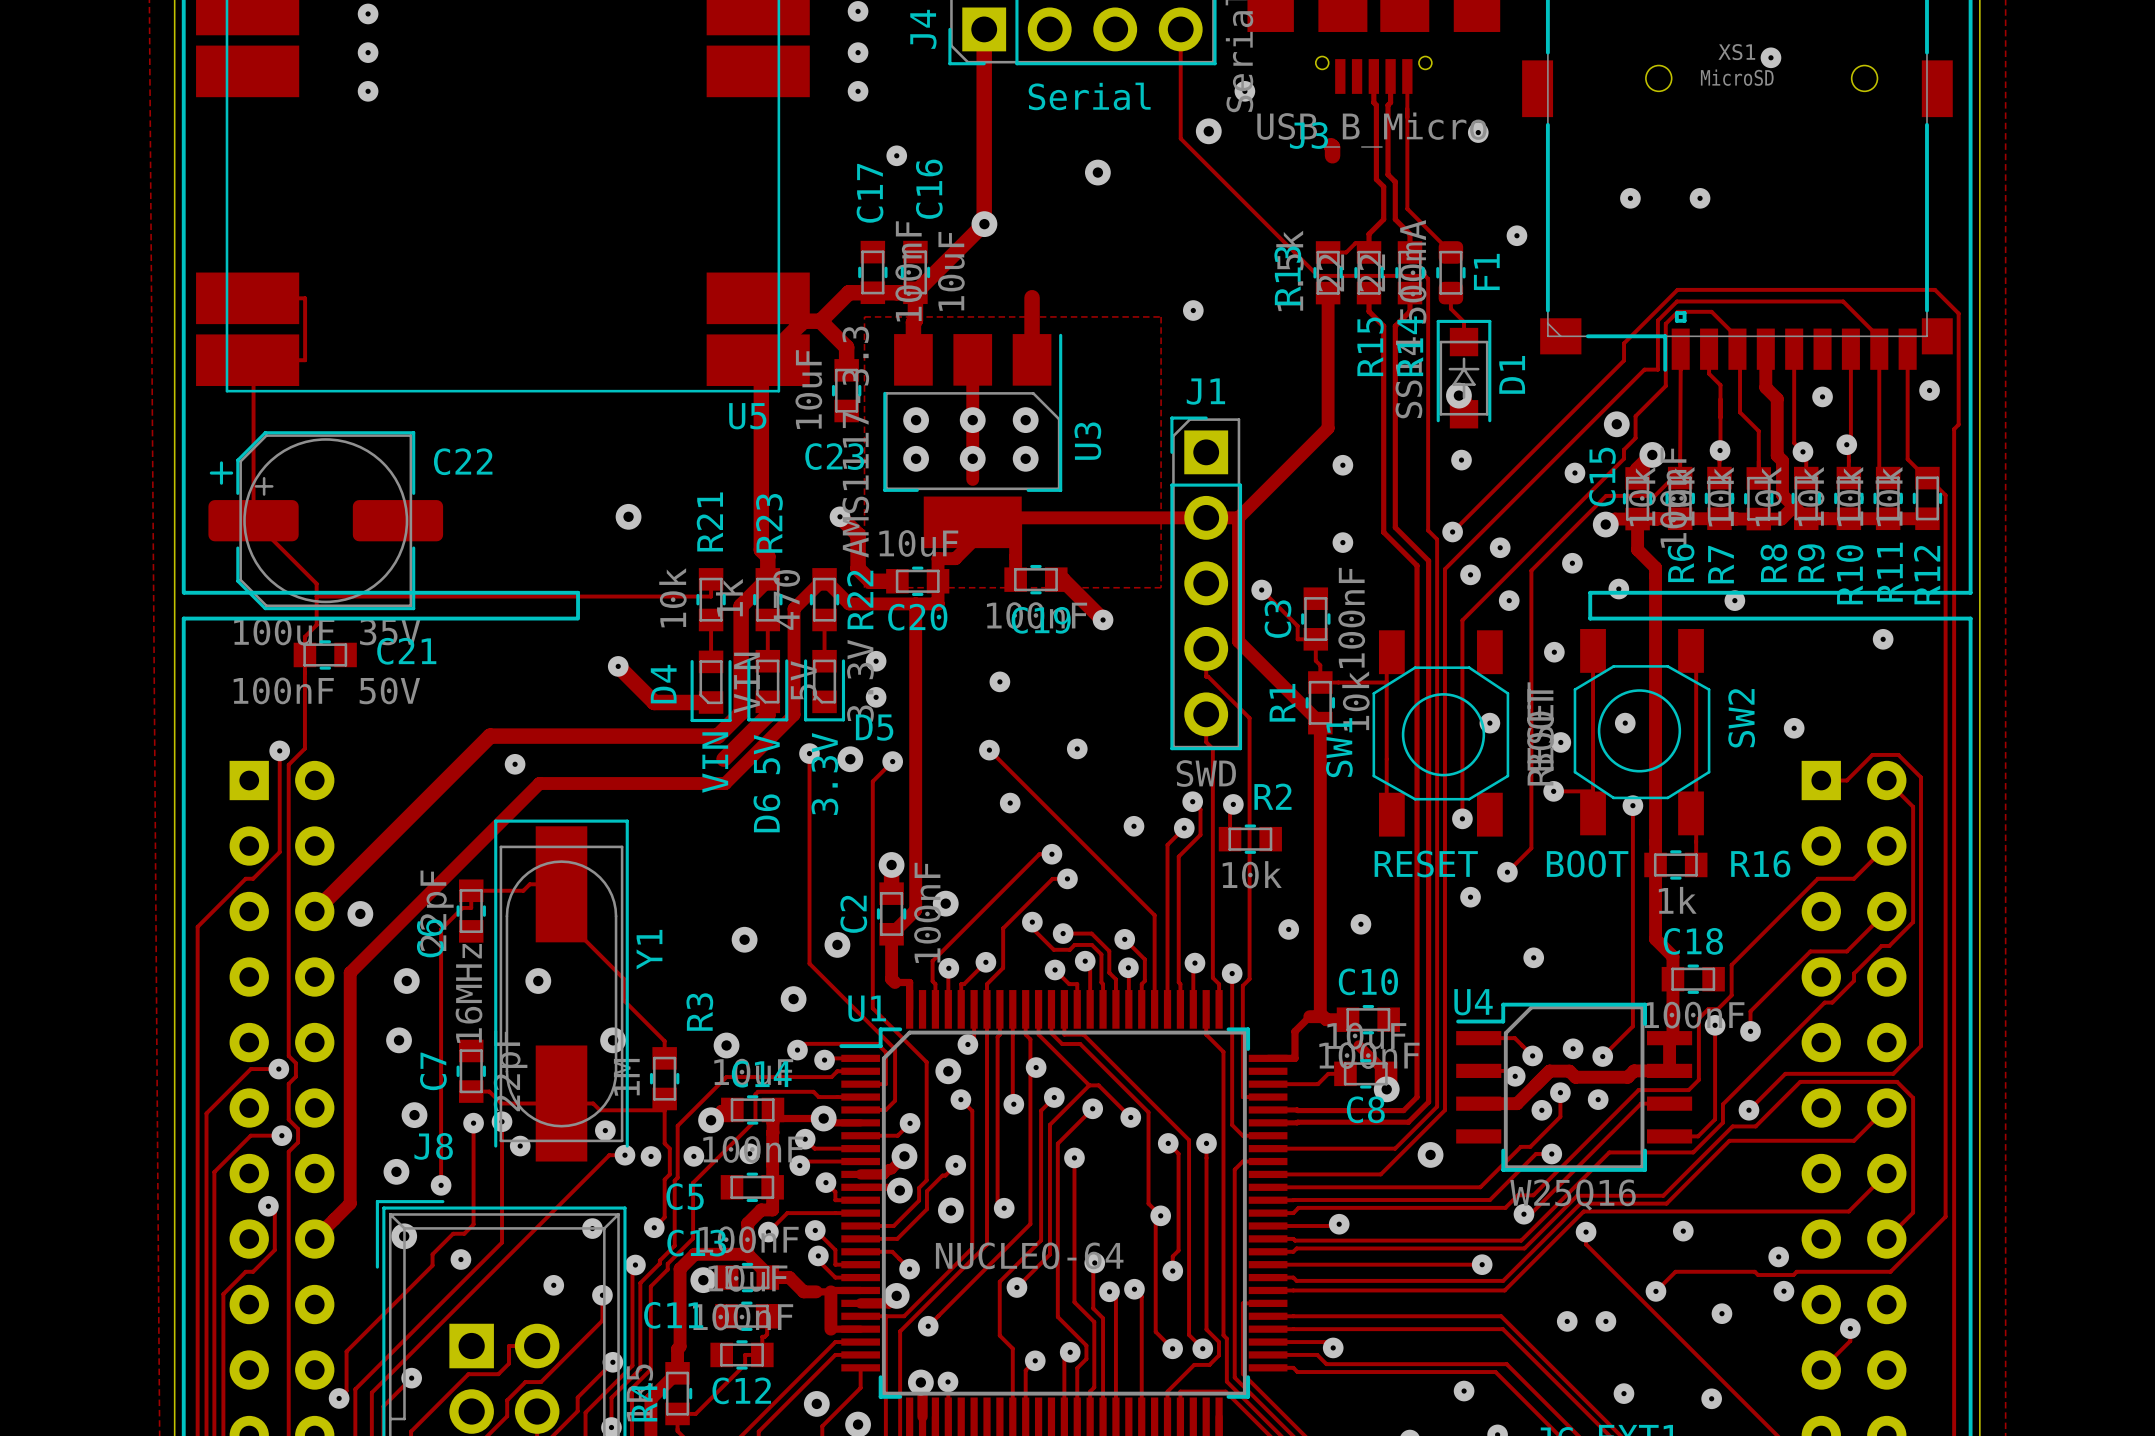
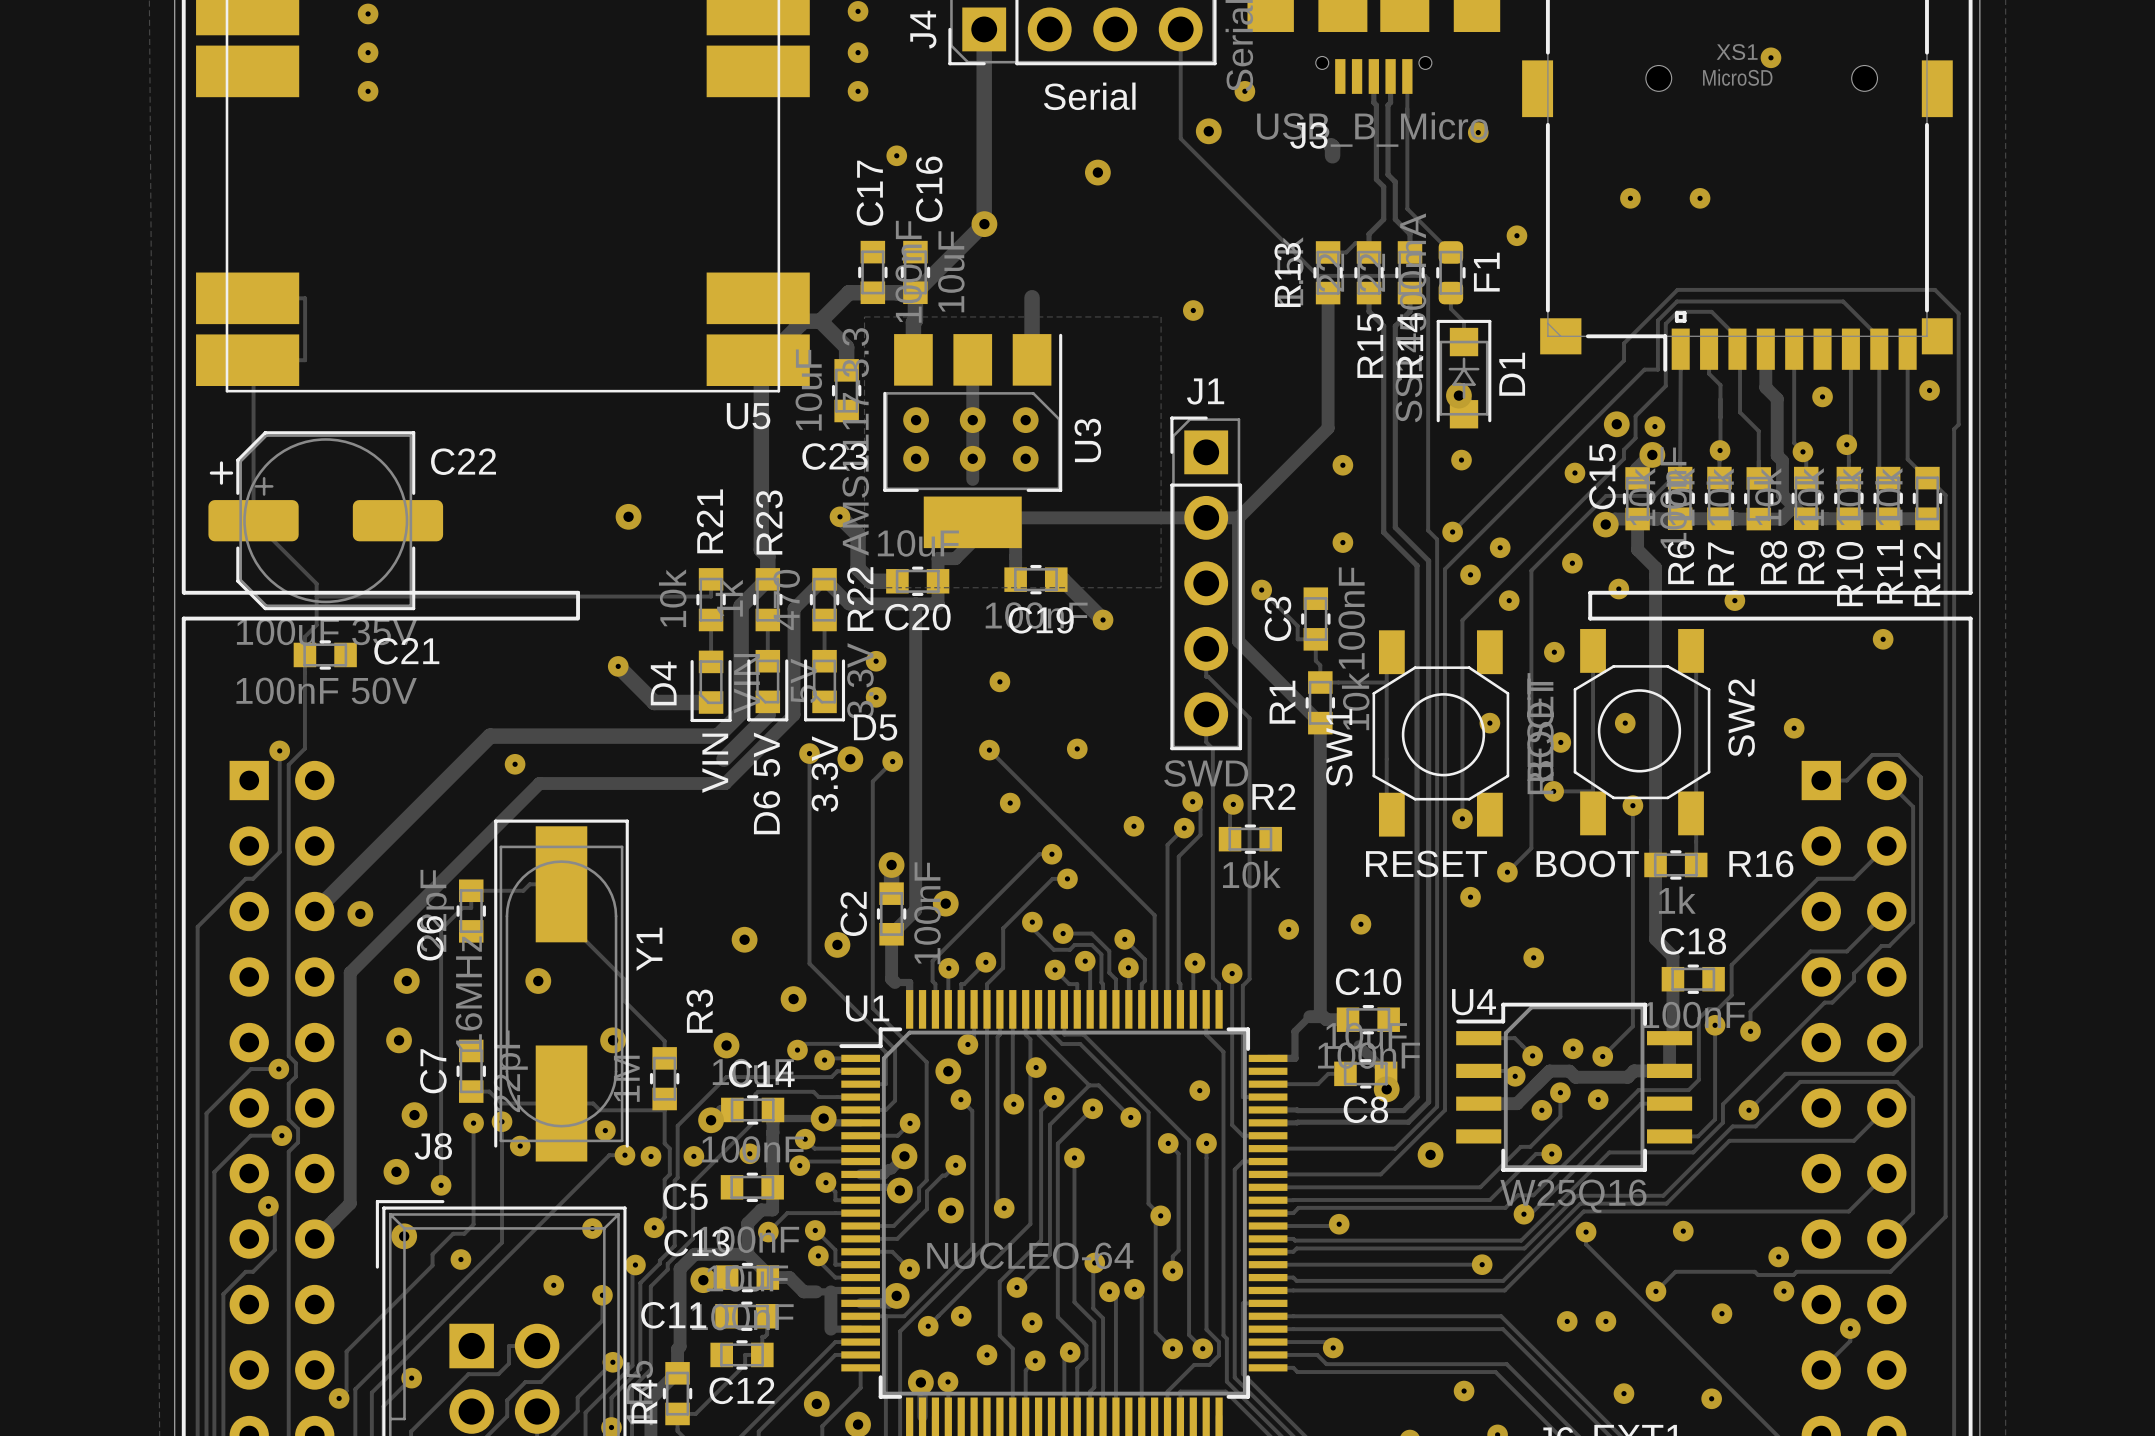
via: none -> (1654, 426)
via: none -> (1199, 1090)
via: none -> (961, 1316)
via: none -> (1032, 1322)
via: none -> (987, 1354)

